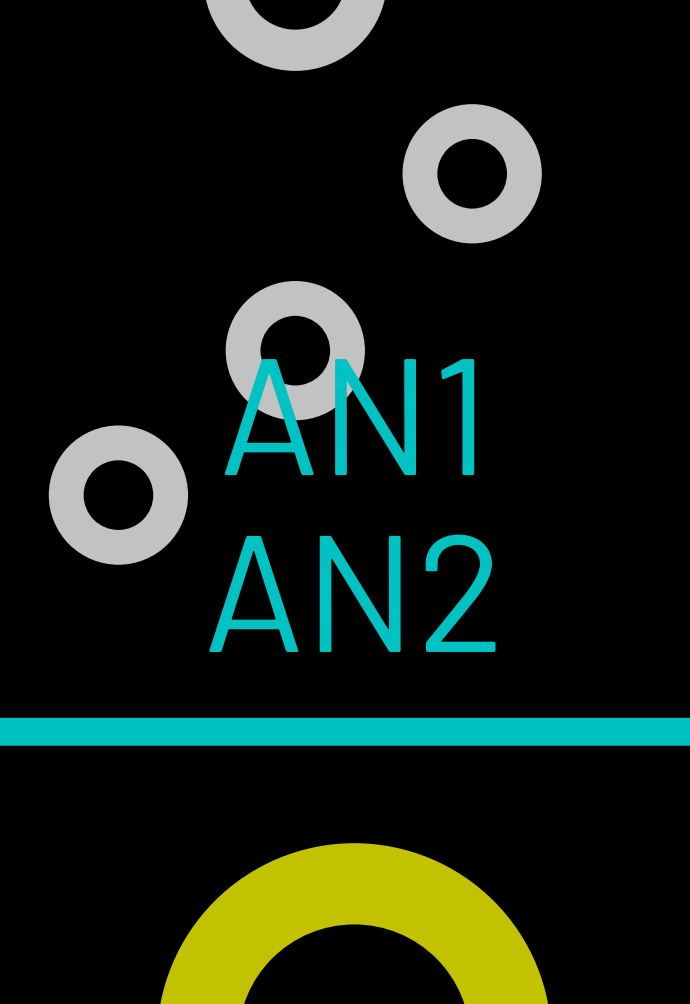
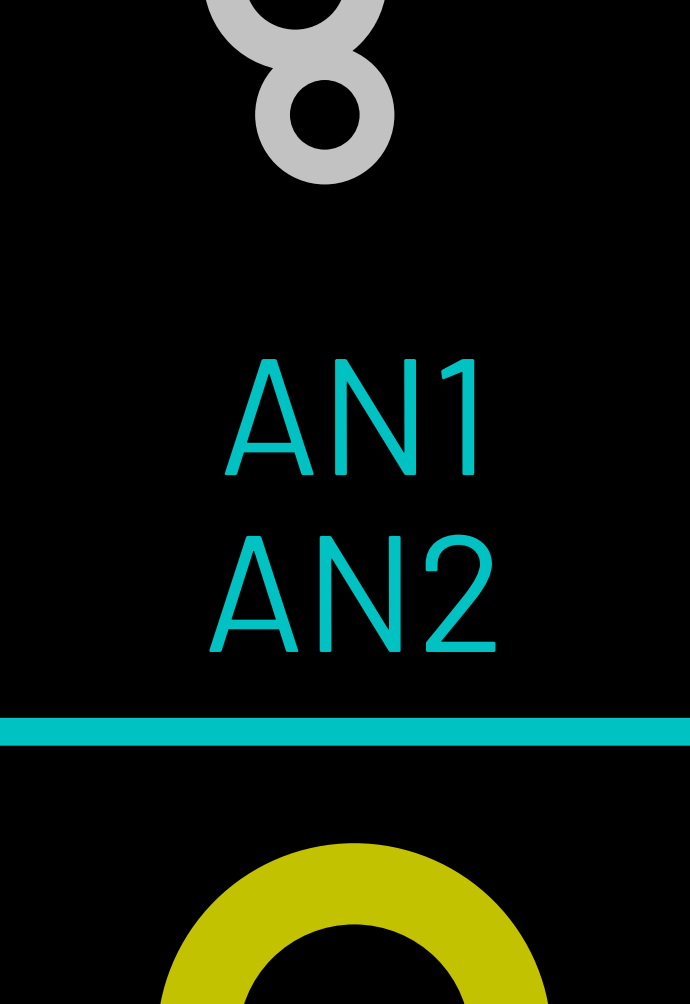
via: none -> (324, 114)
via: (472, 173) -> none
via: (295, 350) -> none
via: (118, 495) -> none

